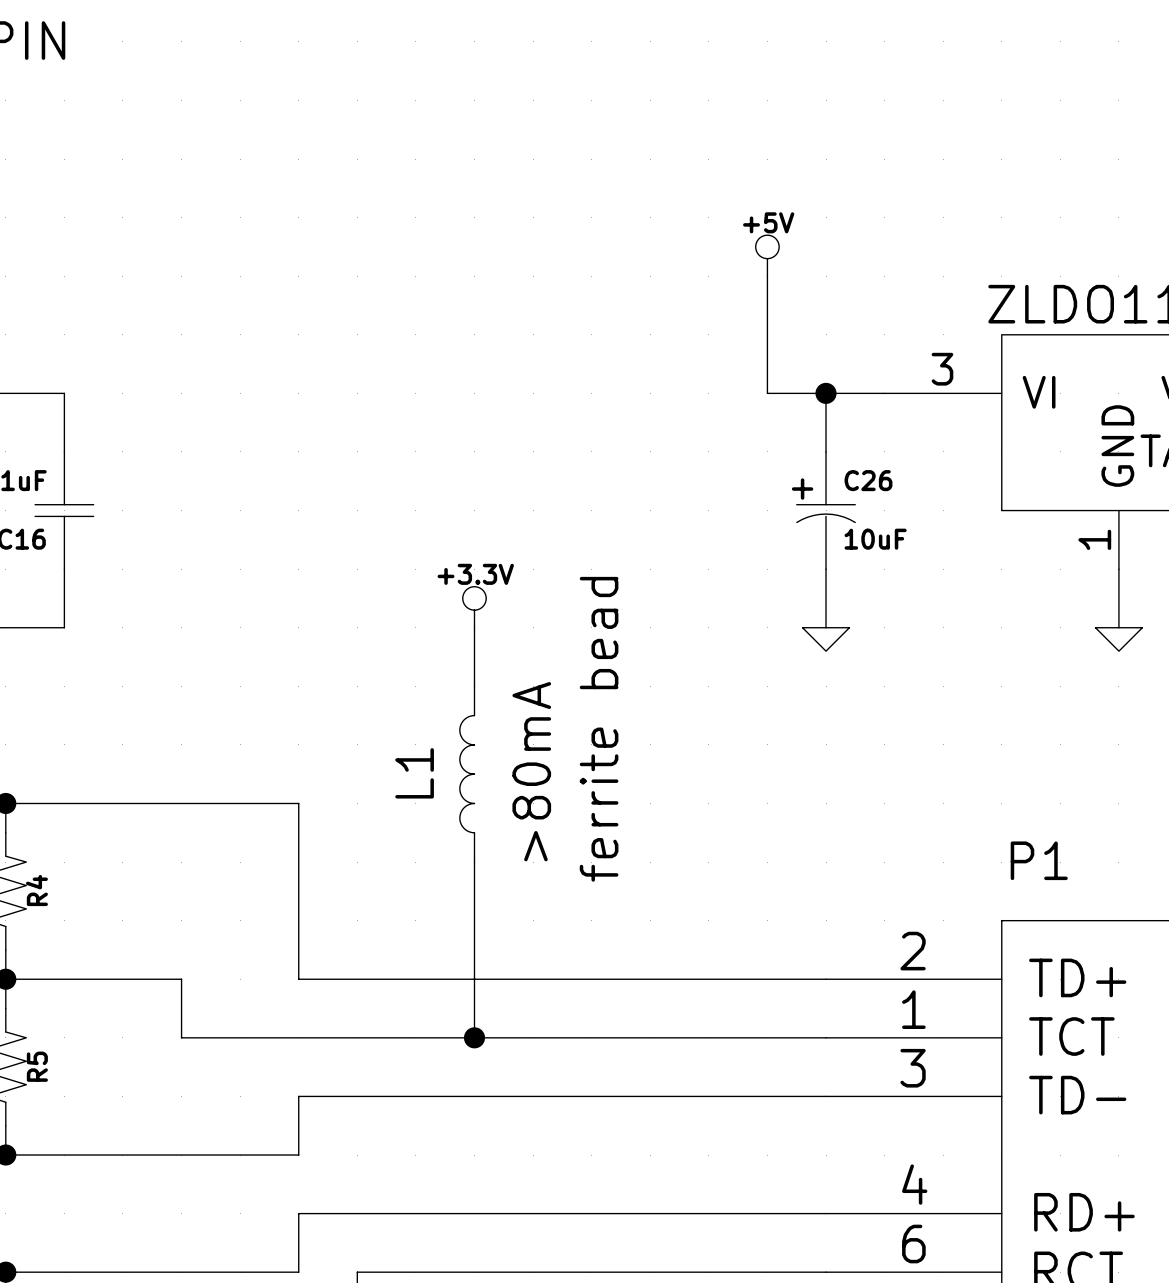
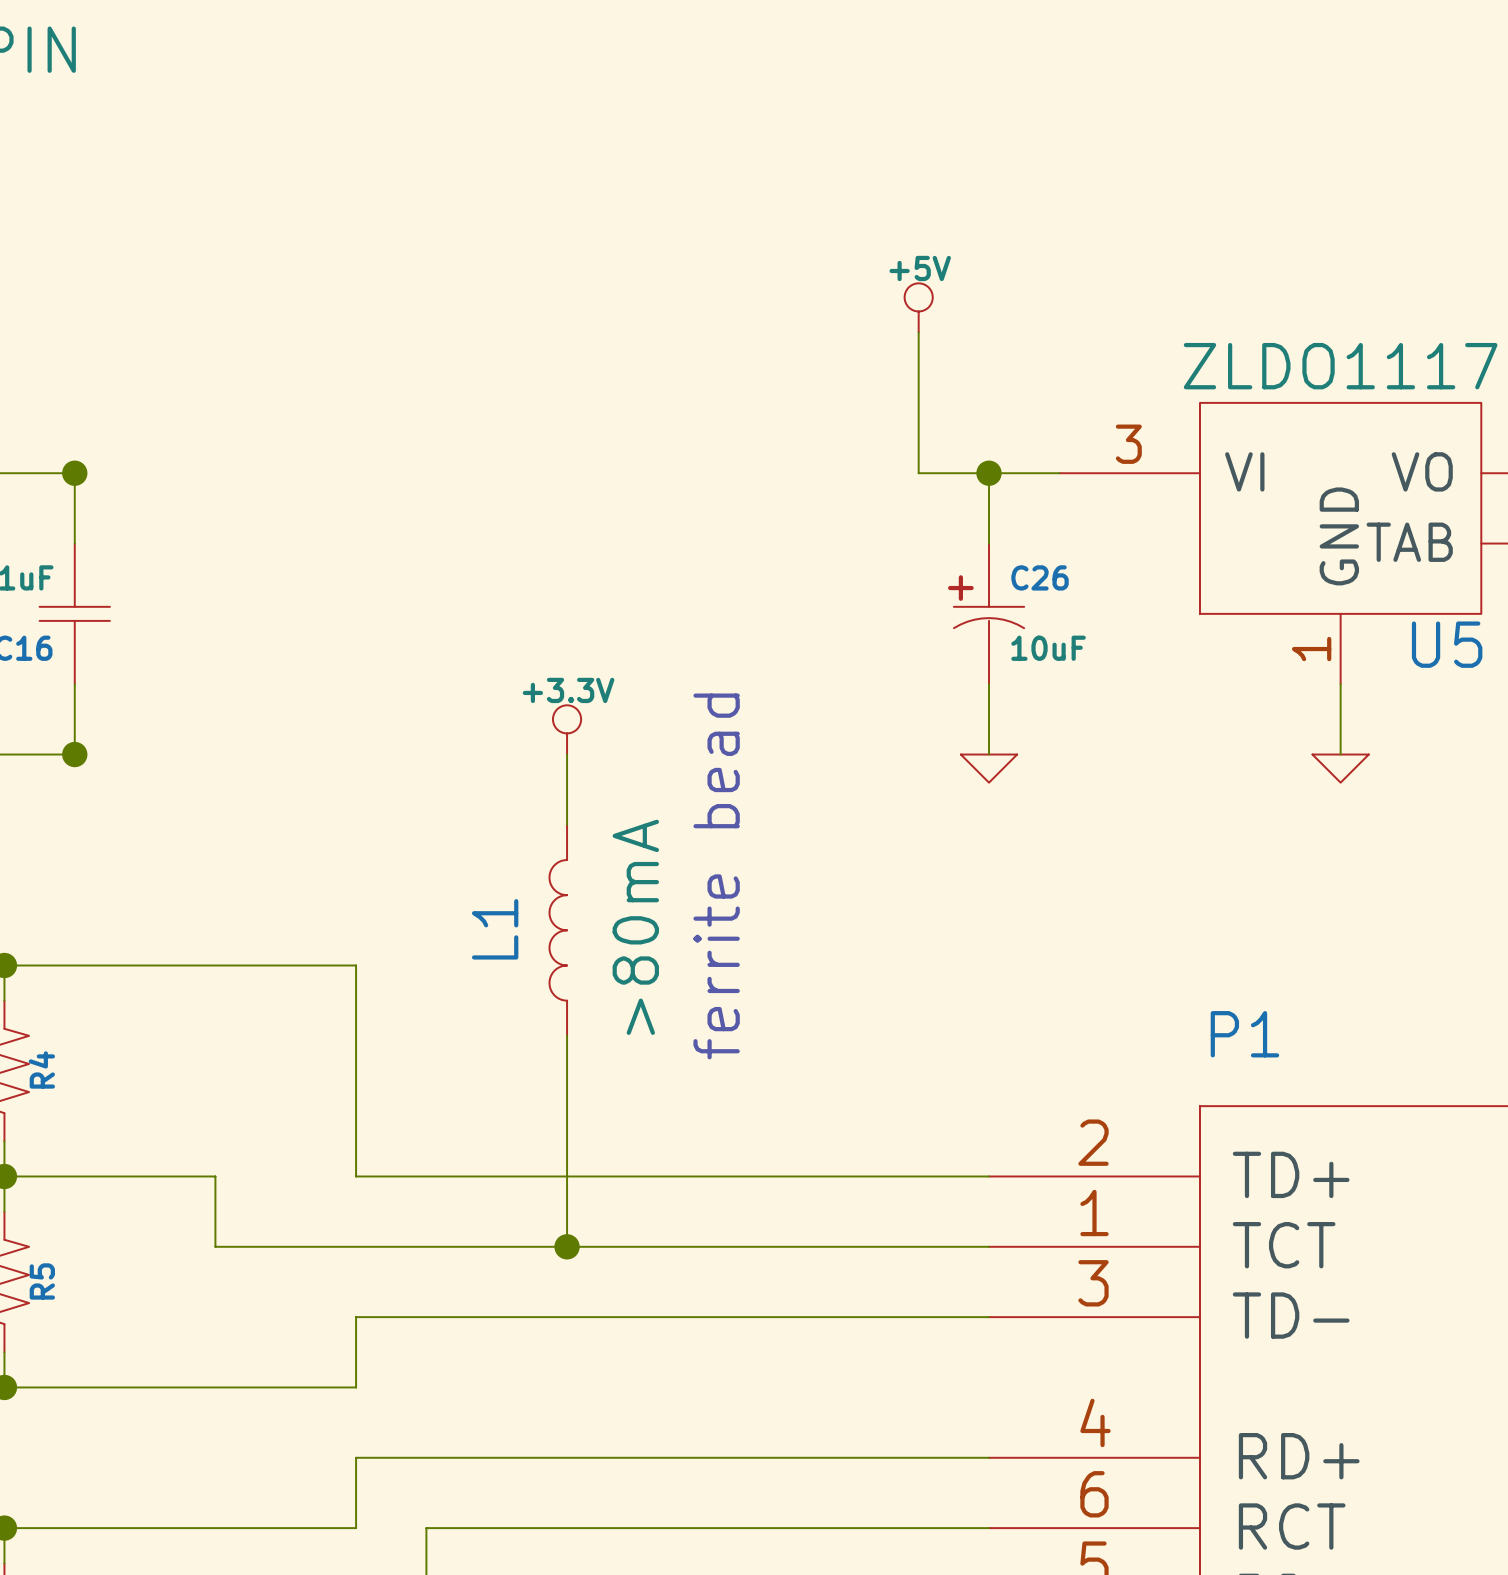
junction: none -> (74, 473)
junction: none -> (74, 754)

